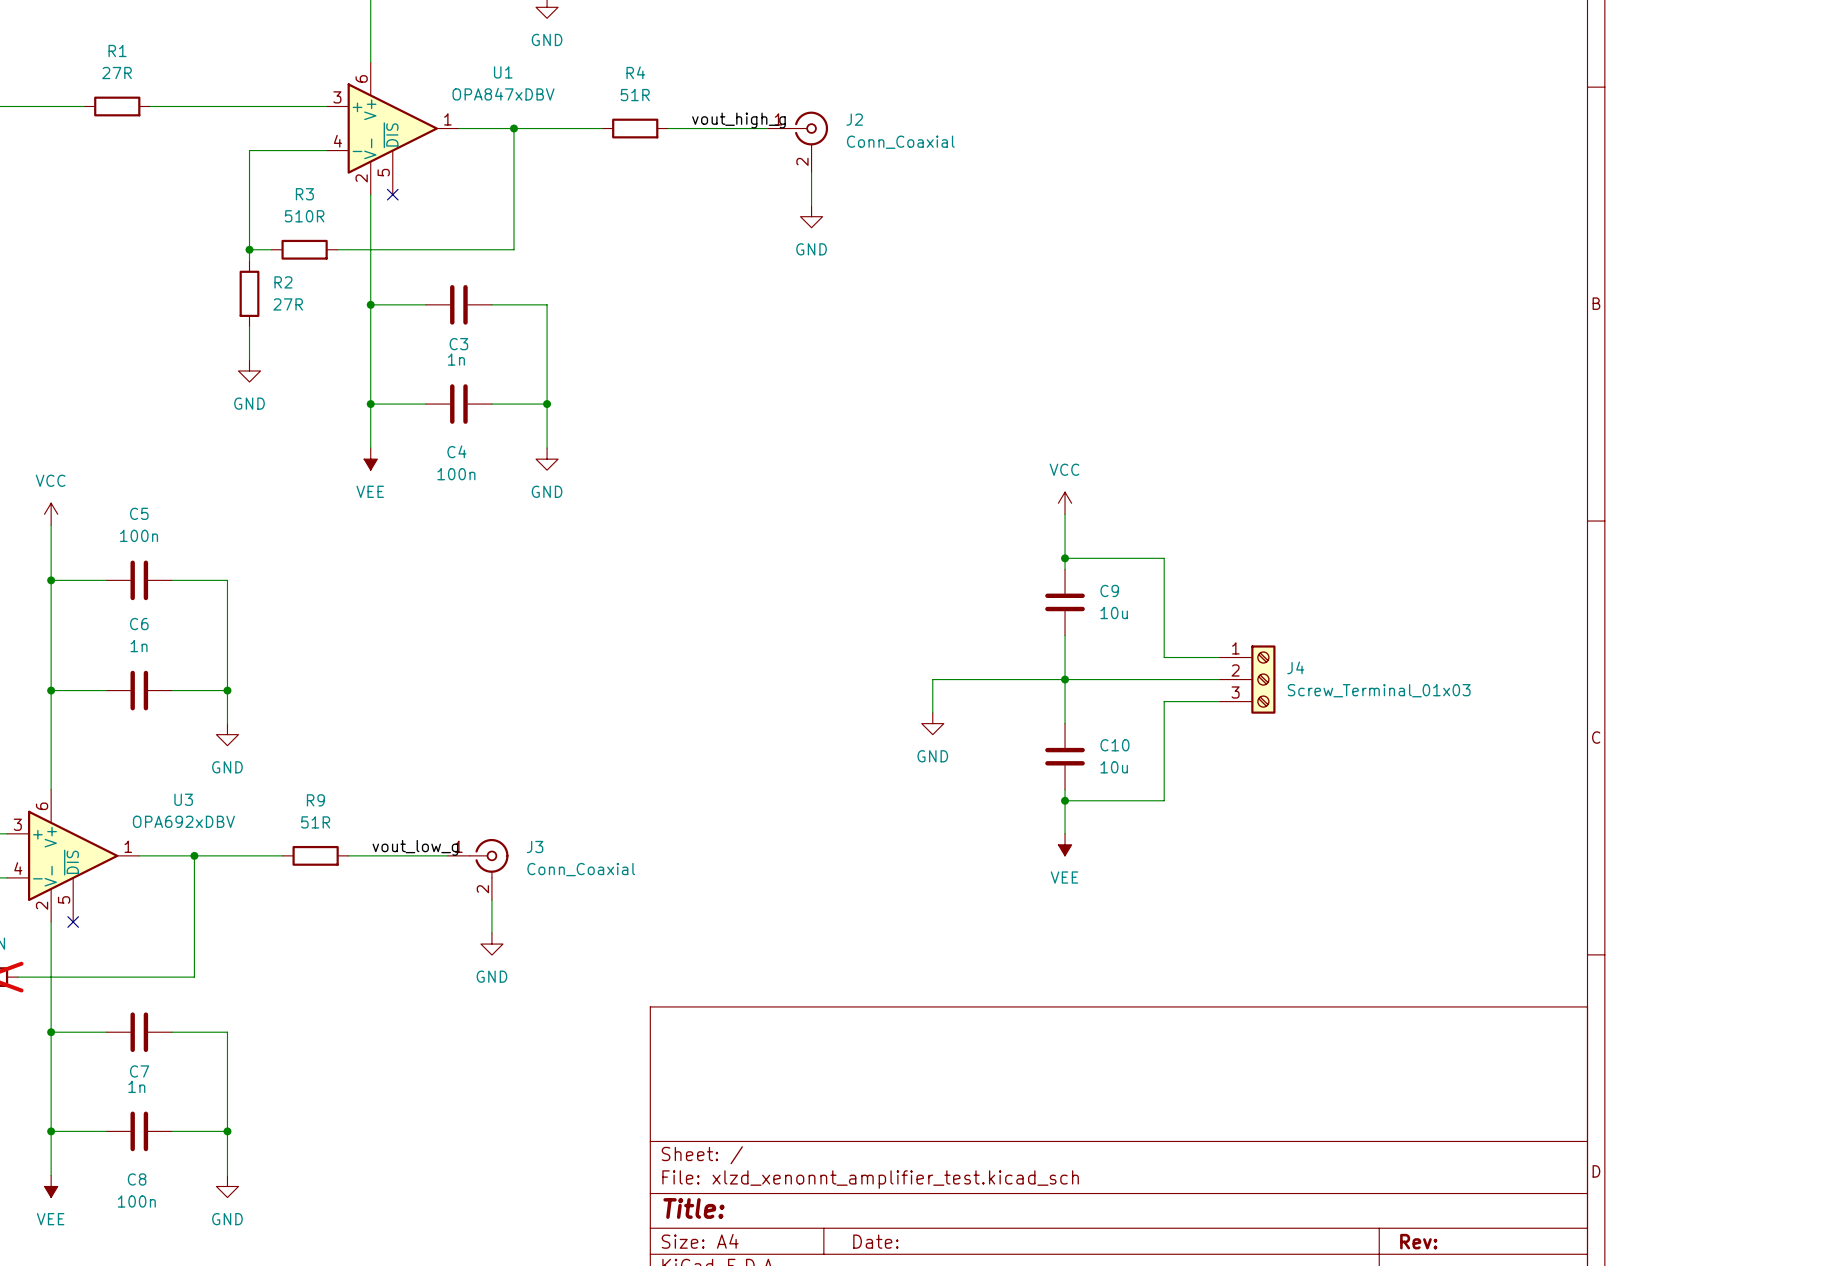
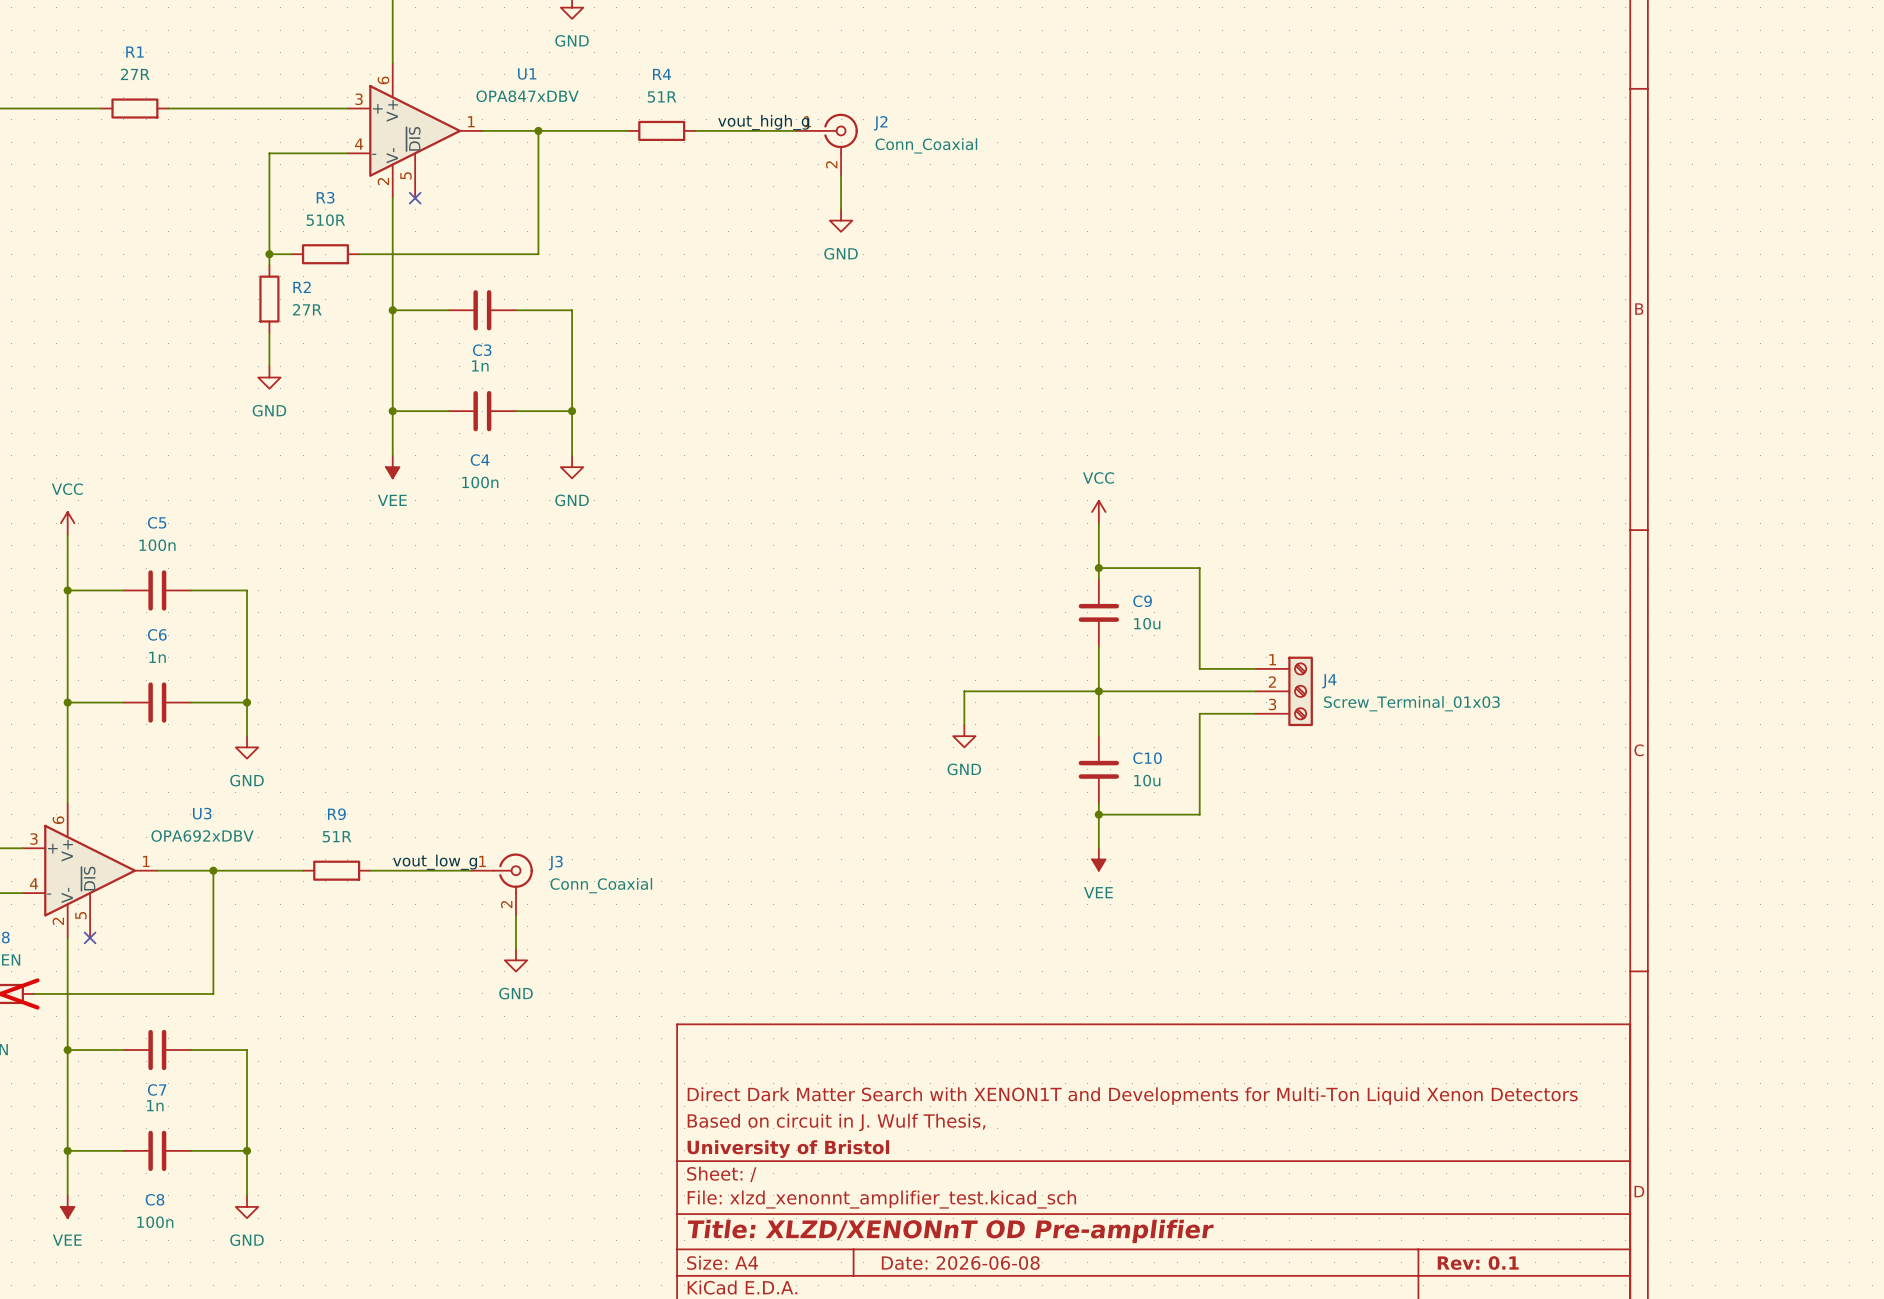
title block: none -> Direct Dark Matter Search with XENON1T and Developments for Multi-Ton Liquid Xenon Detectors (1132, 1096)
title block: none -> Based on circuit in J. Wulf Thesis, (836, 1122)
title block: none -> University of Bristol (788, 1149)
title block: Title: (693, 1208) -> Title: XLZD/XENONnT OD Pre-amplifier (950, 1231)
title block: Date: (875, 1241) -> Date: 2026-06-08 (960, 1263)
title block: Rev: (1418, 1241) -> Rev: 0.1 (1478, 1263)

